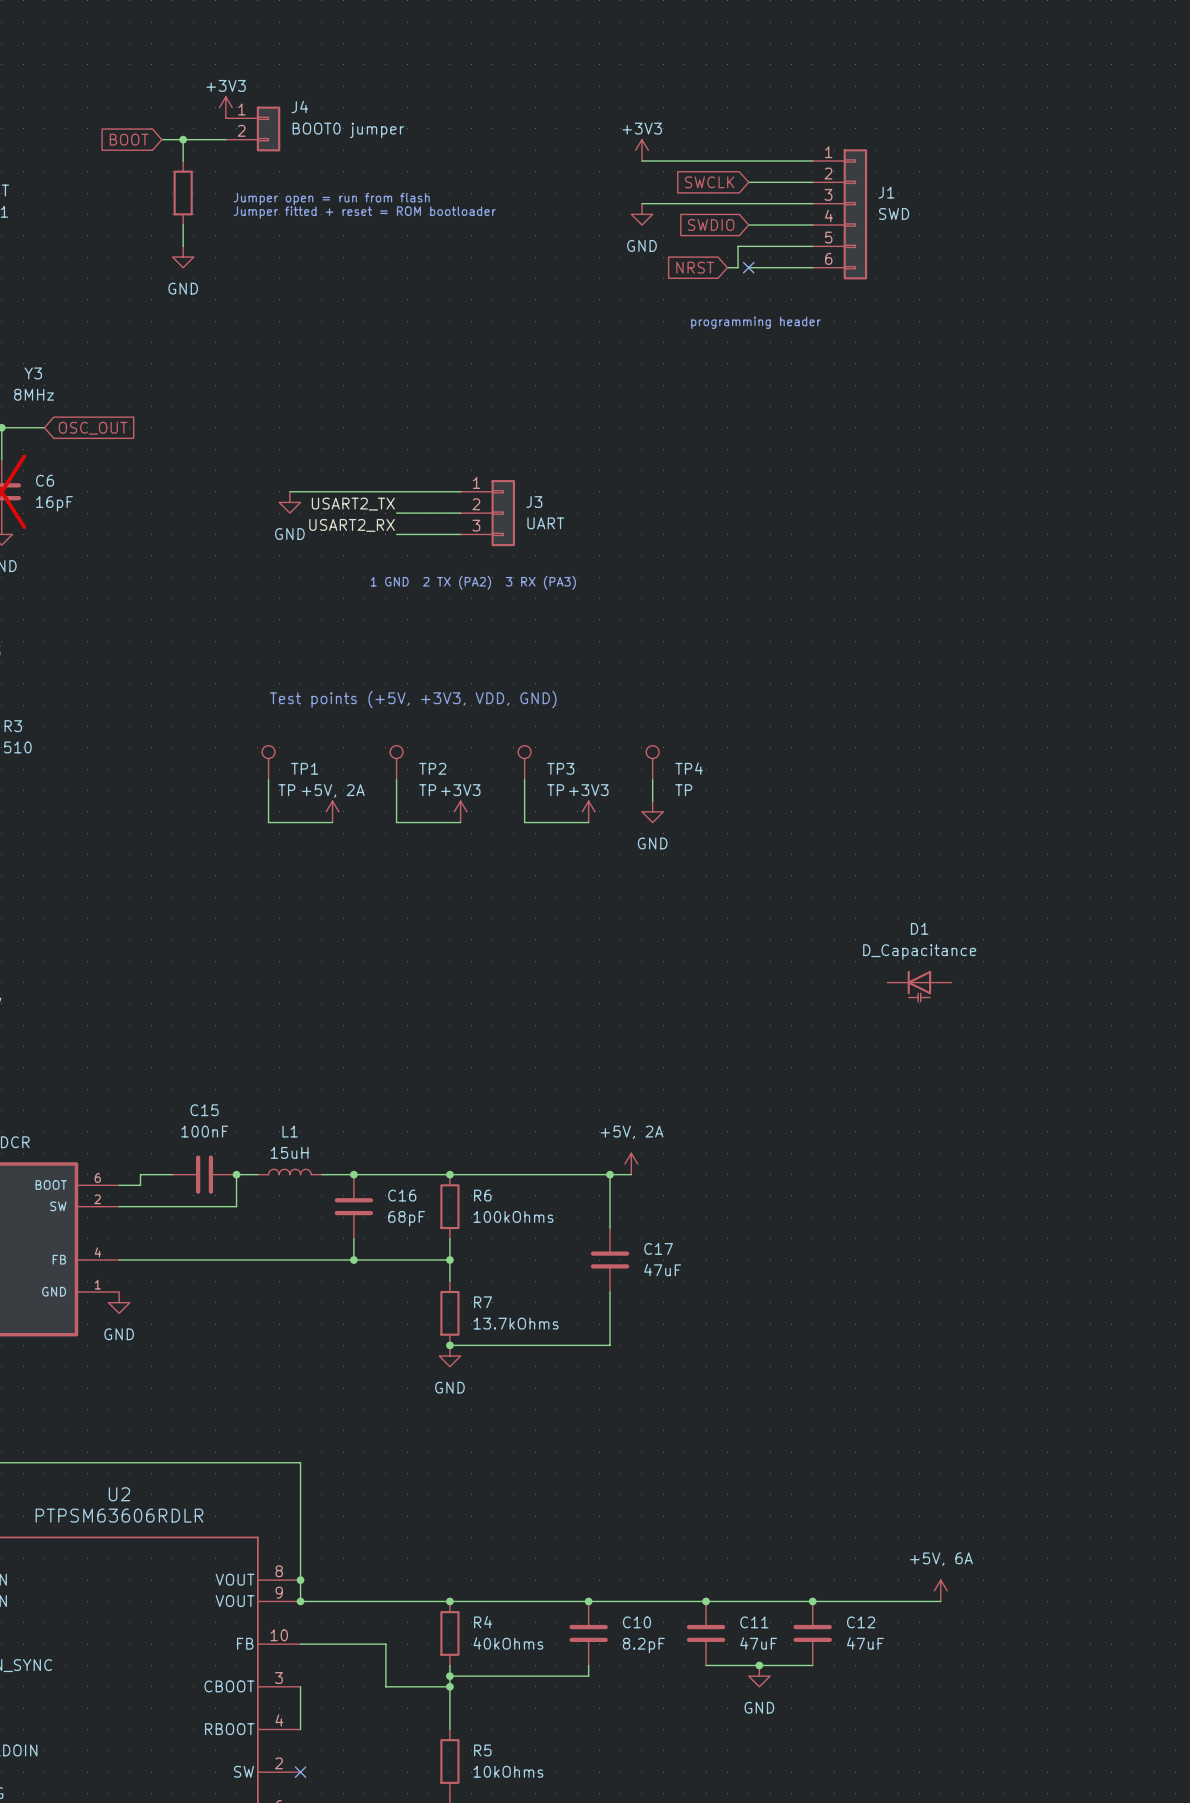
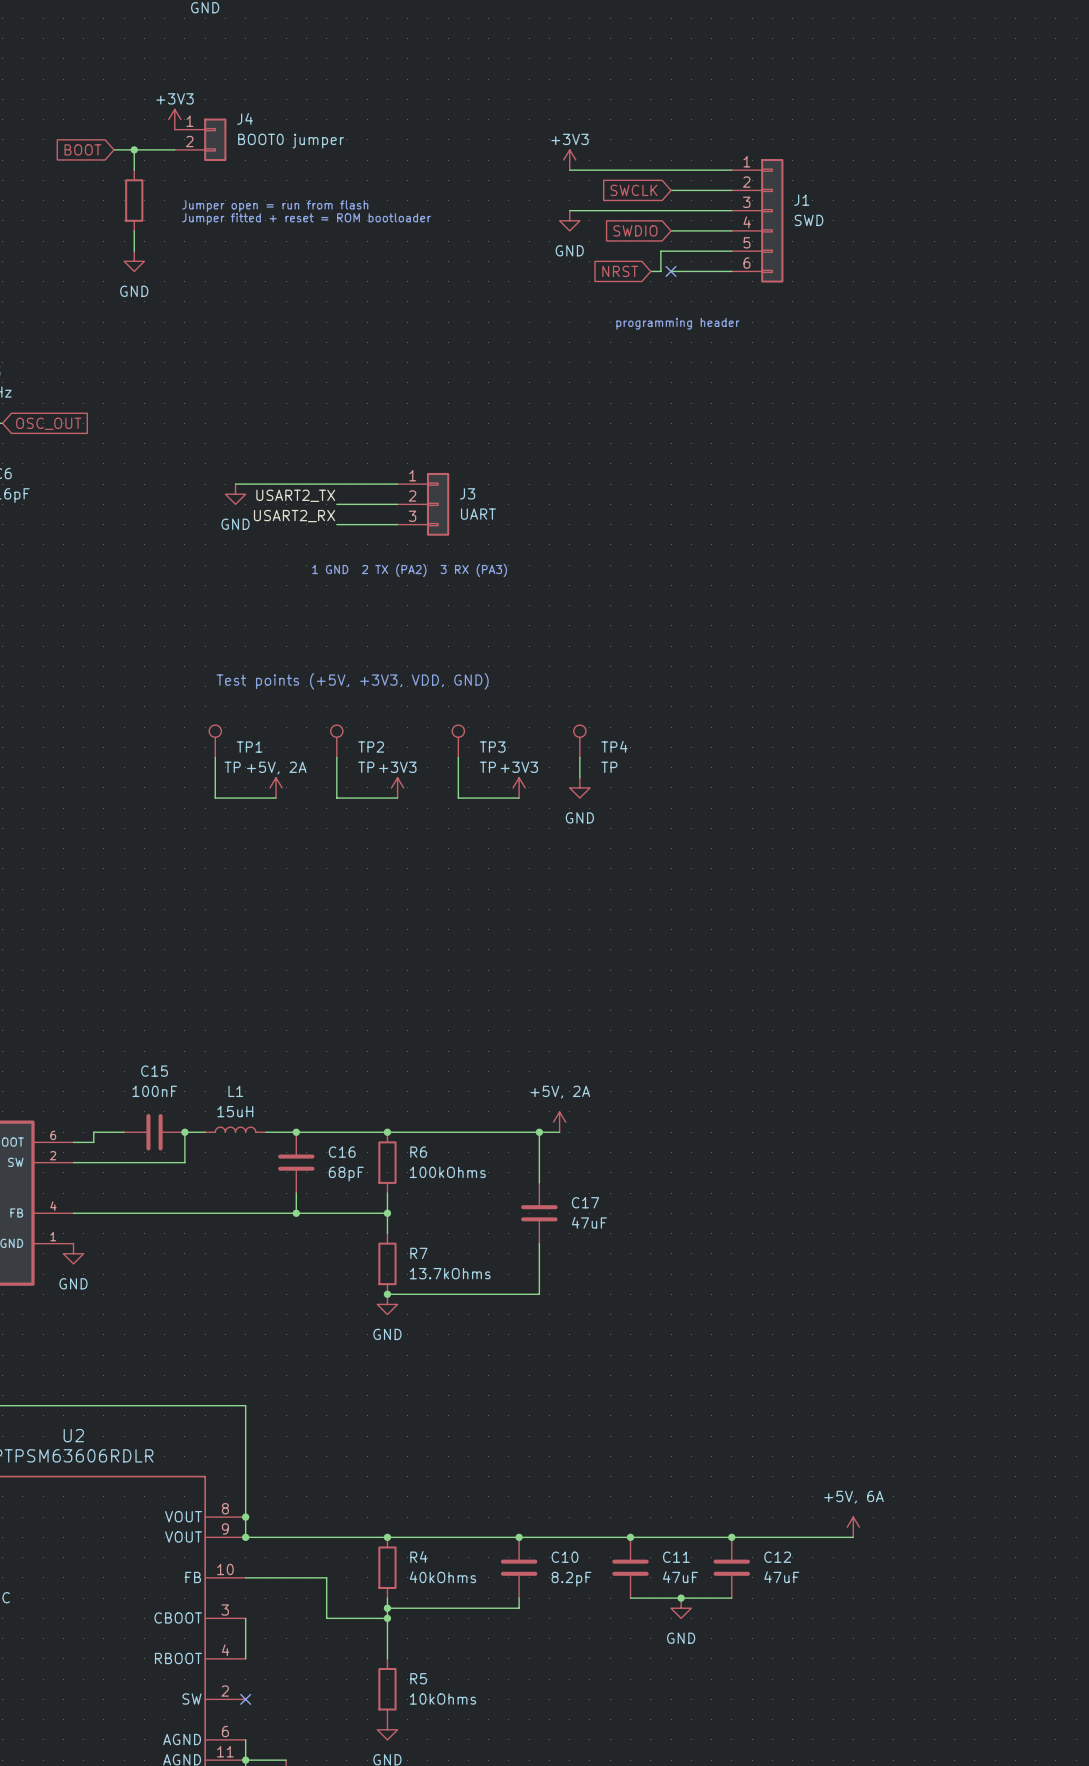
D1: D_Capacitance (919, 986) -> none

